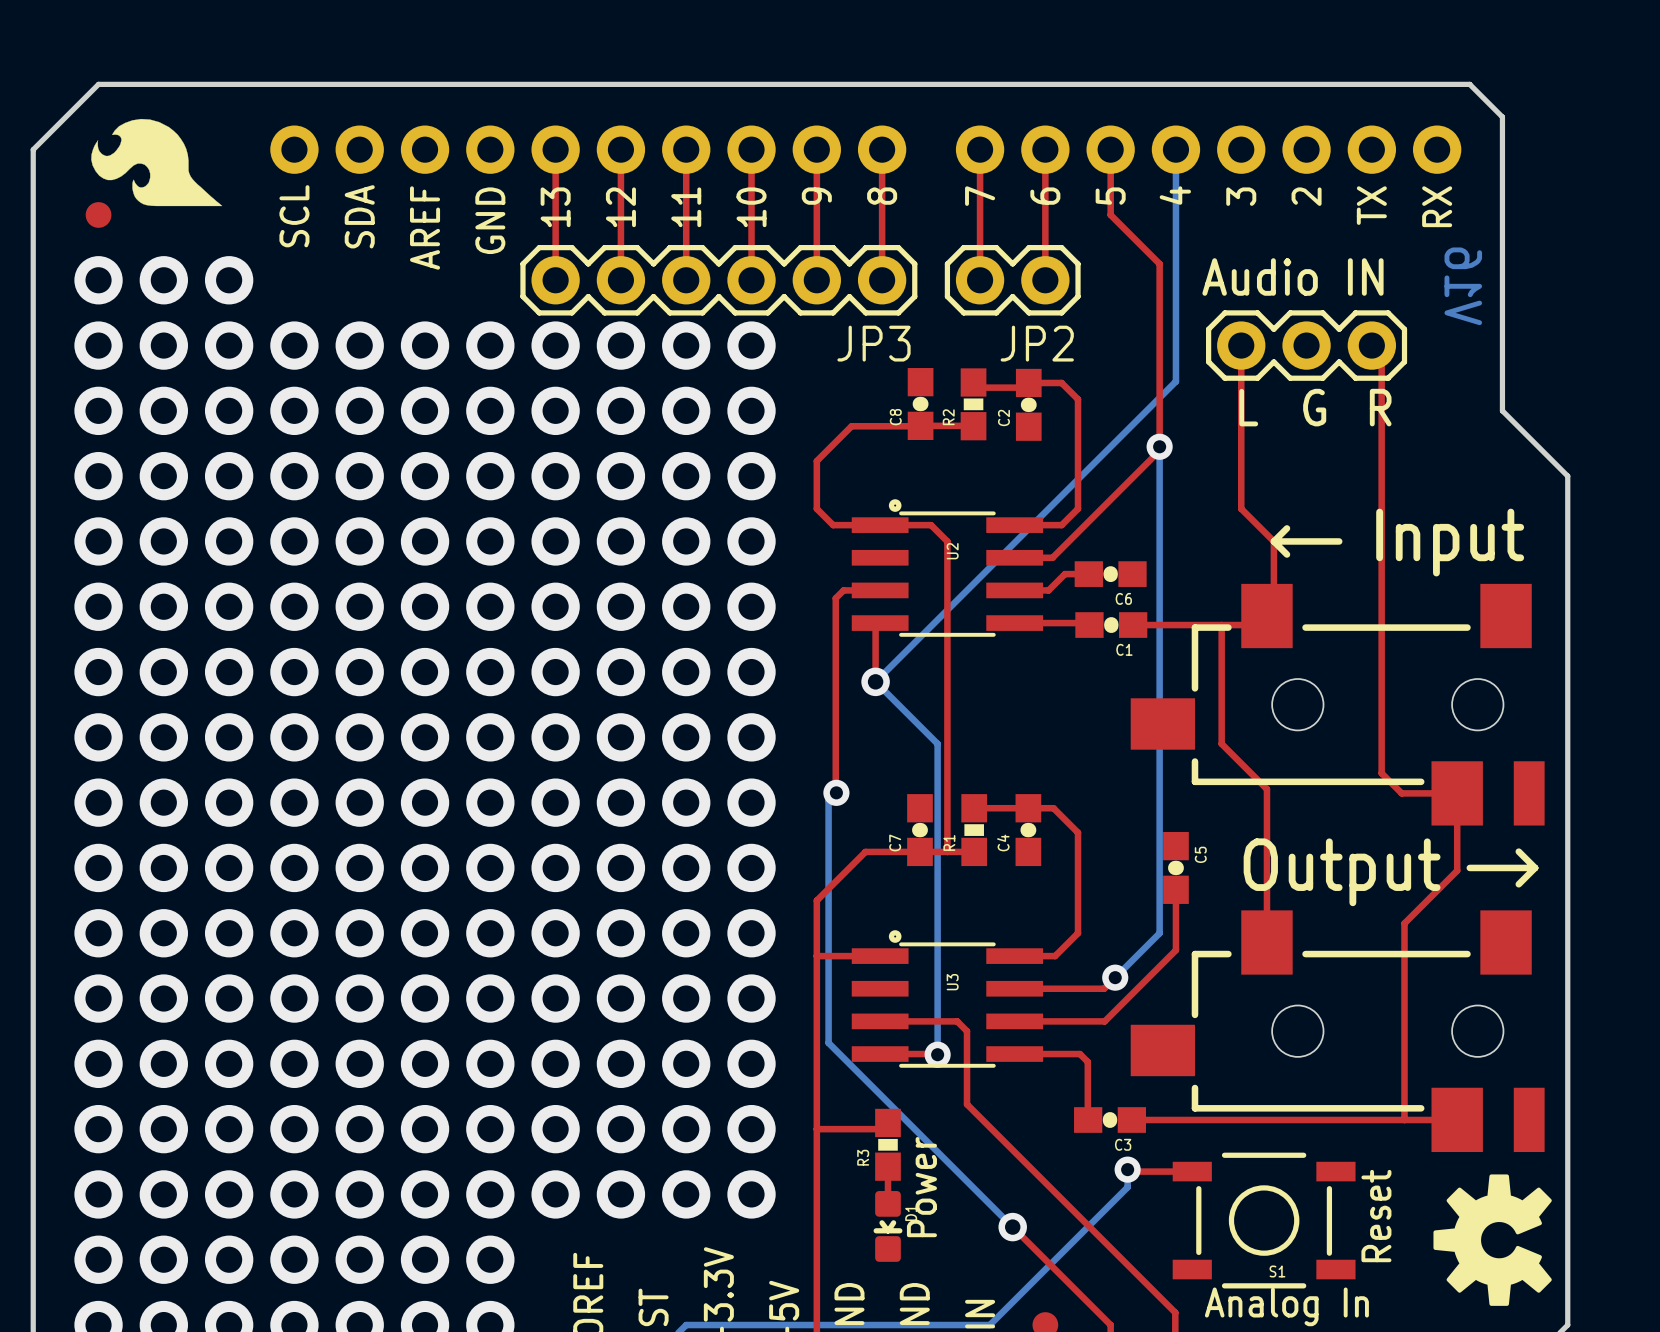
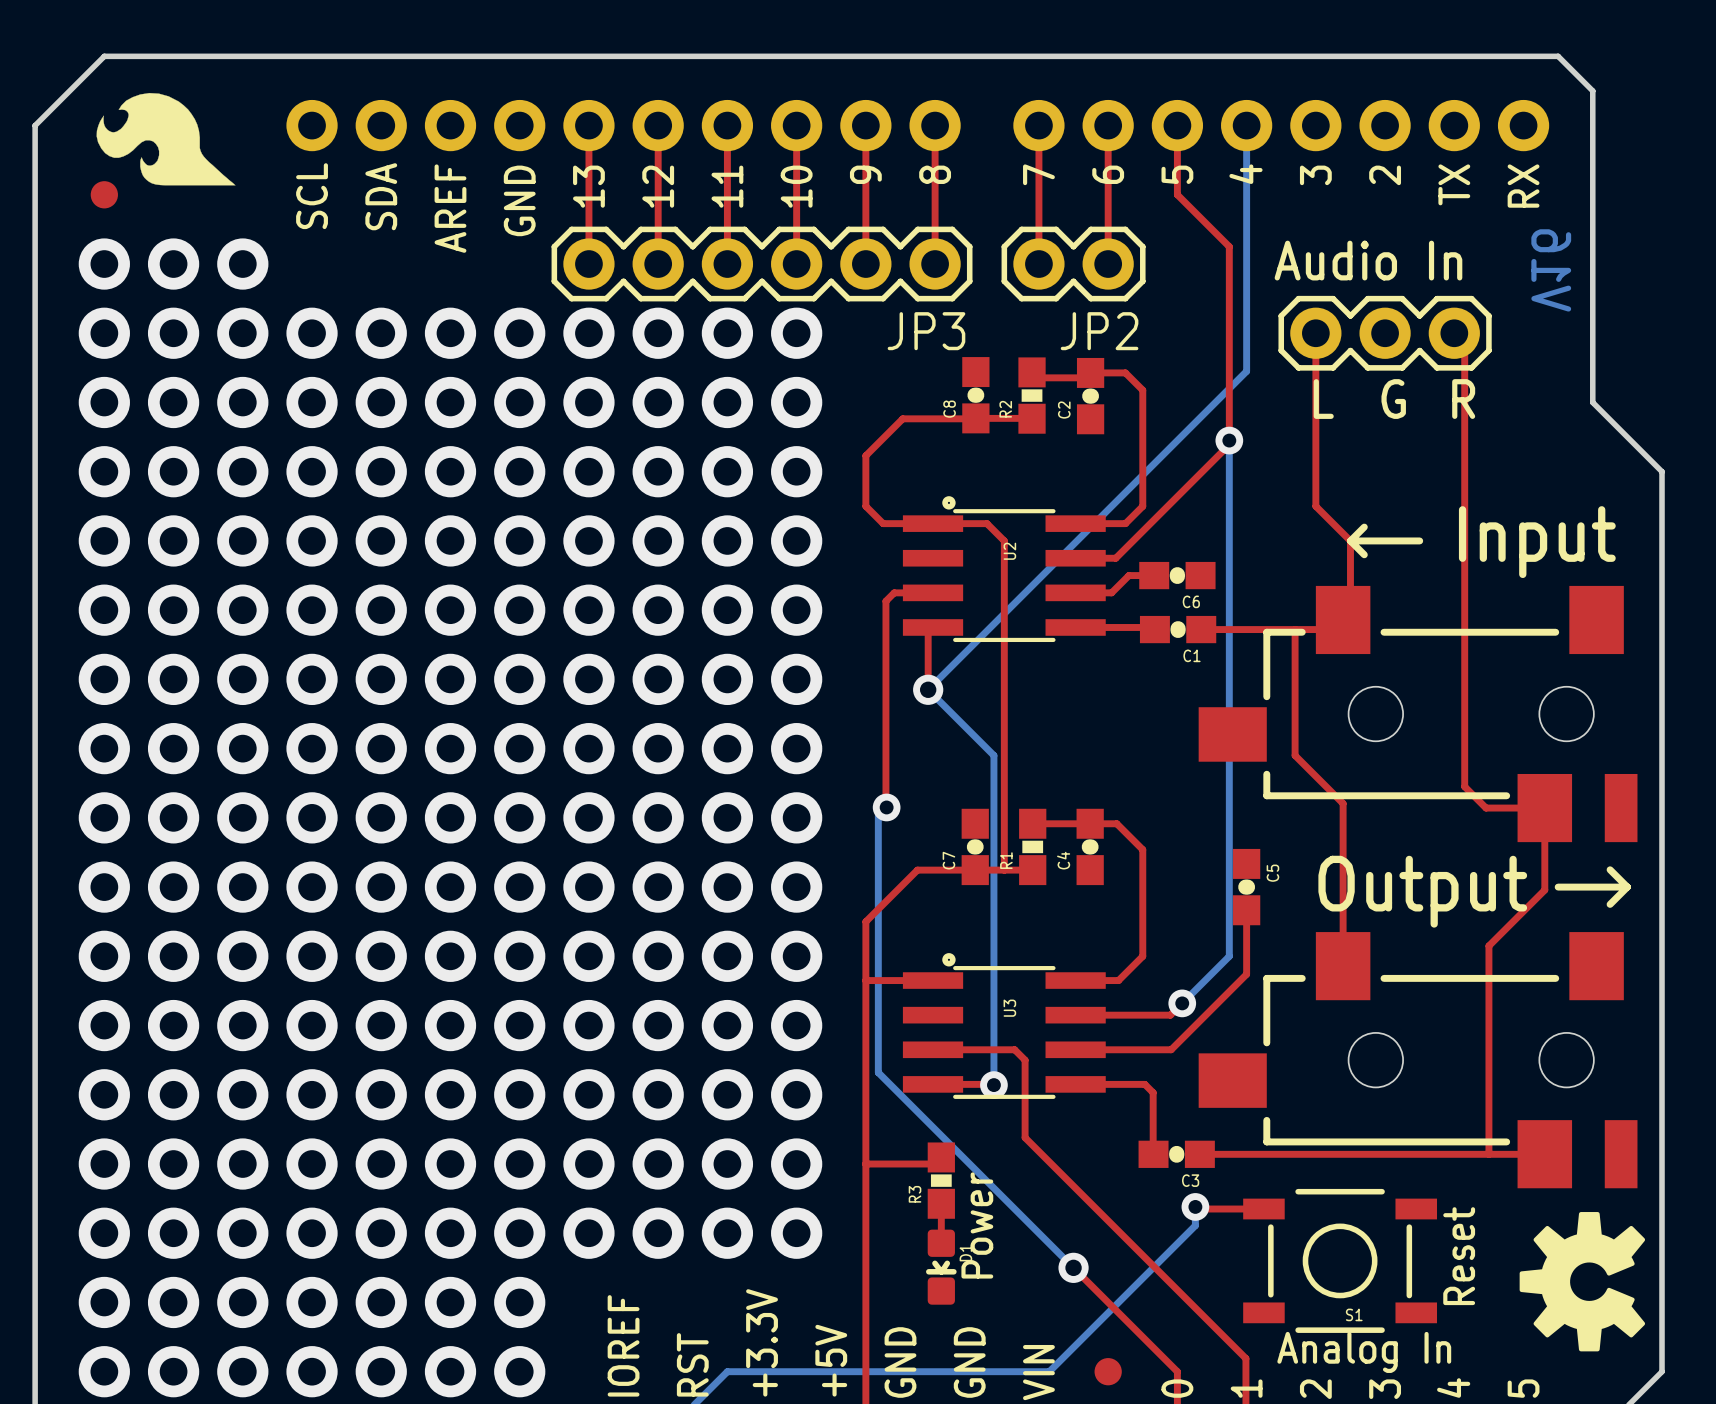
text: Audio IN (1292, 277) -> Audio In (1368, 260)

